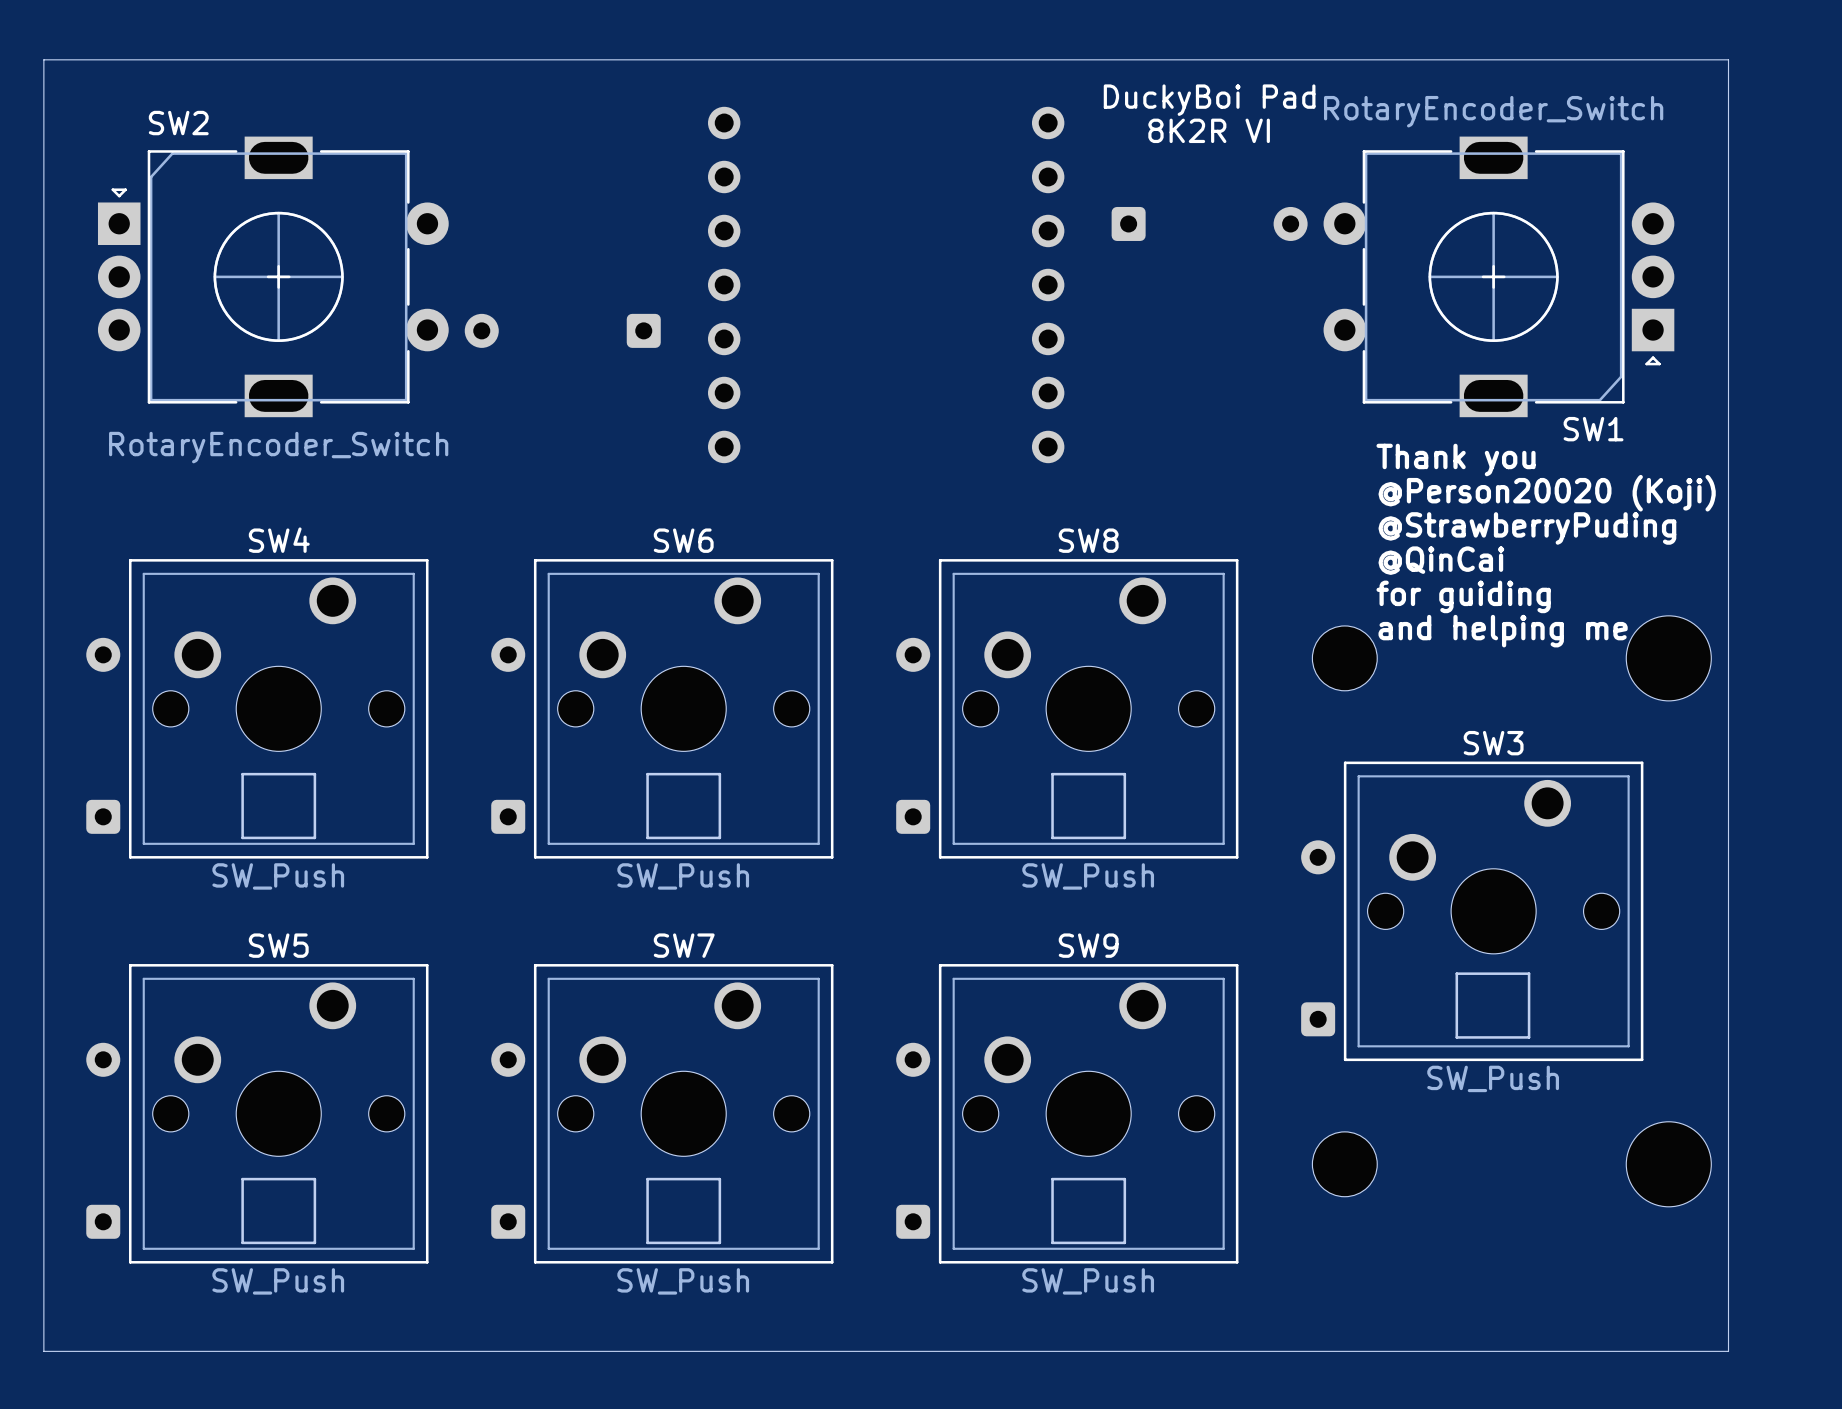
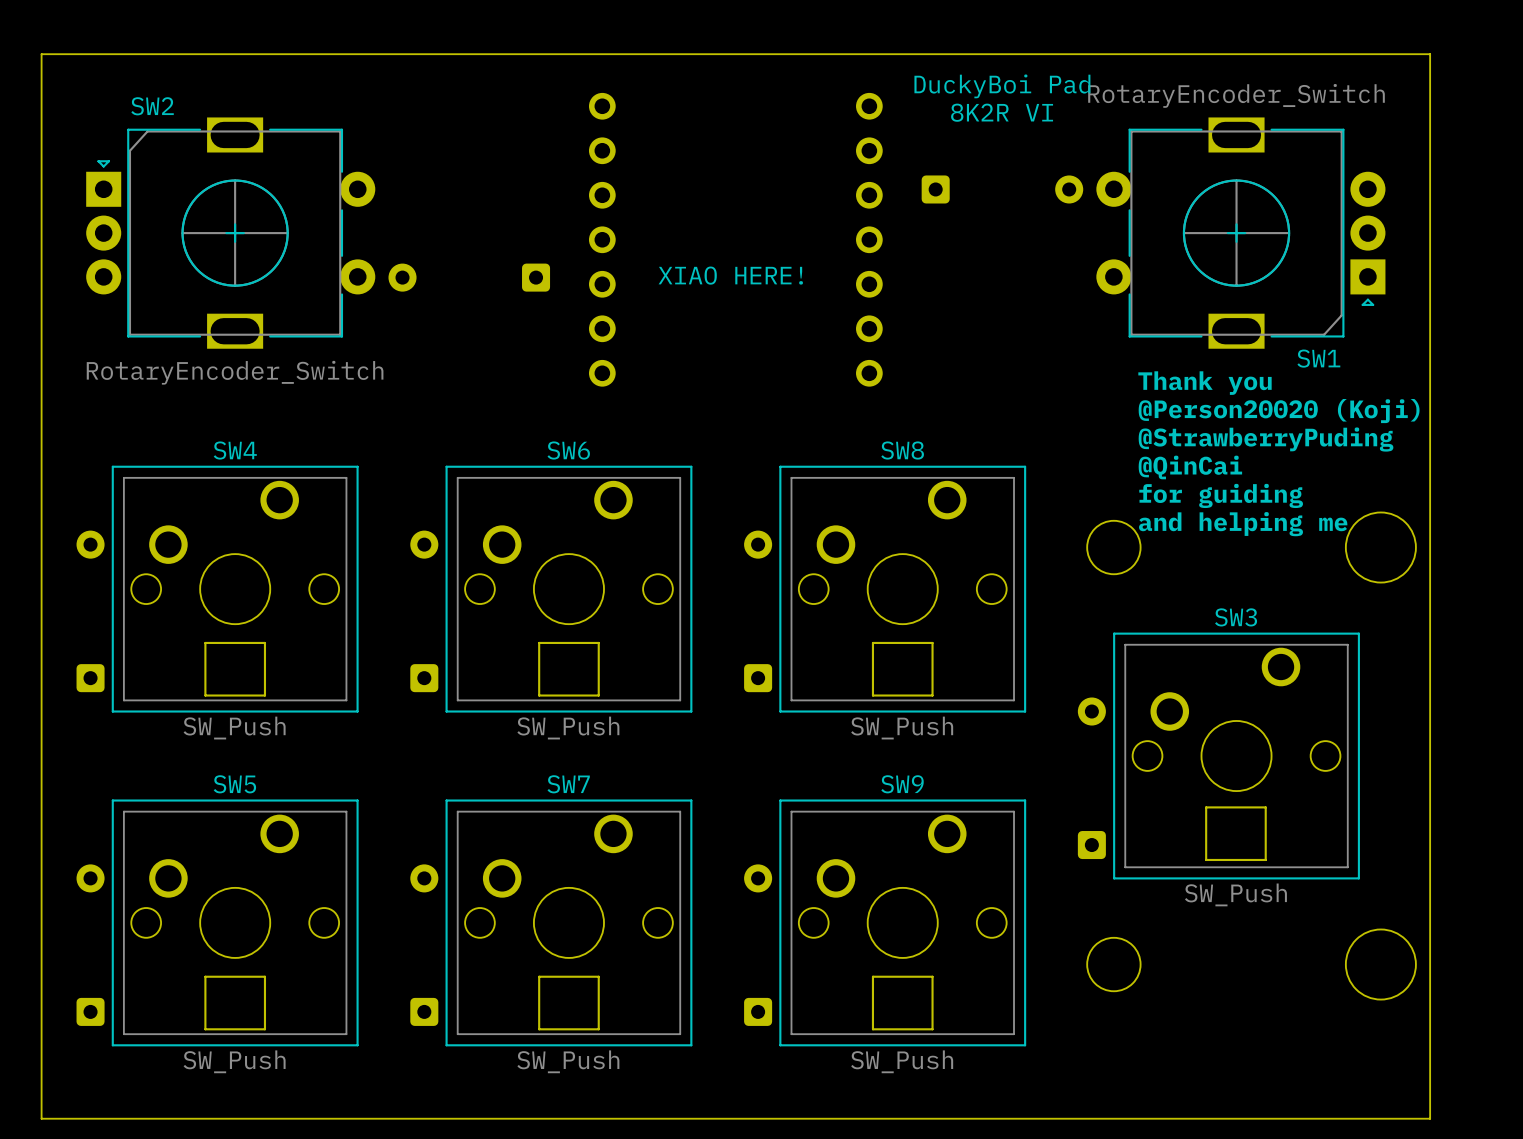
text: none -> XIAO HERE! (730, 275)

